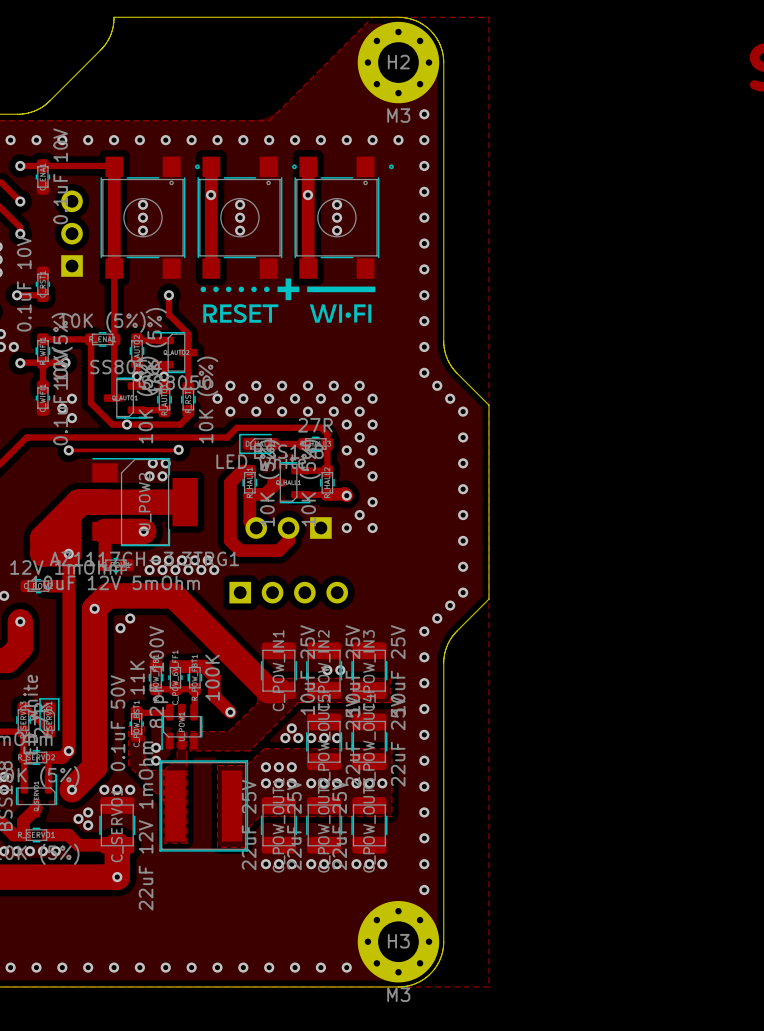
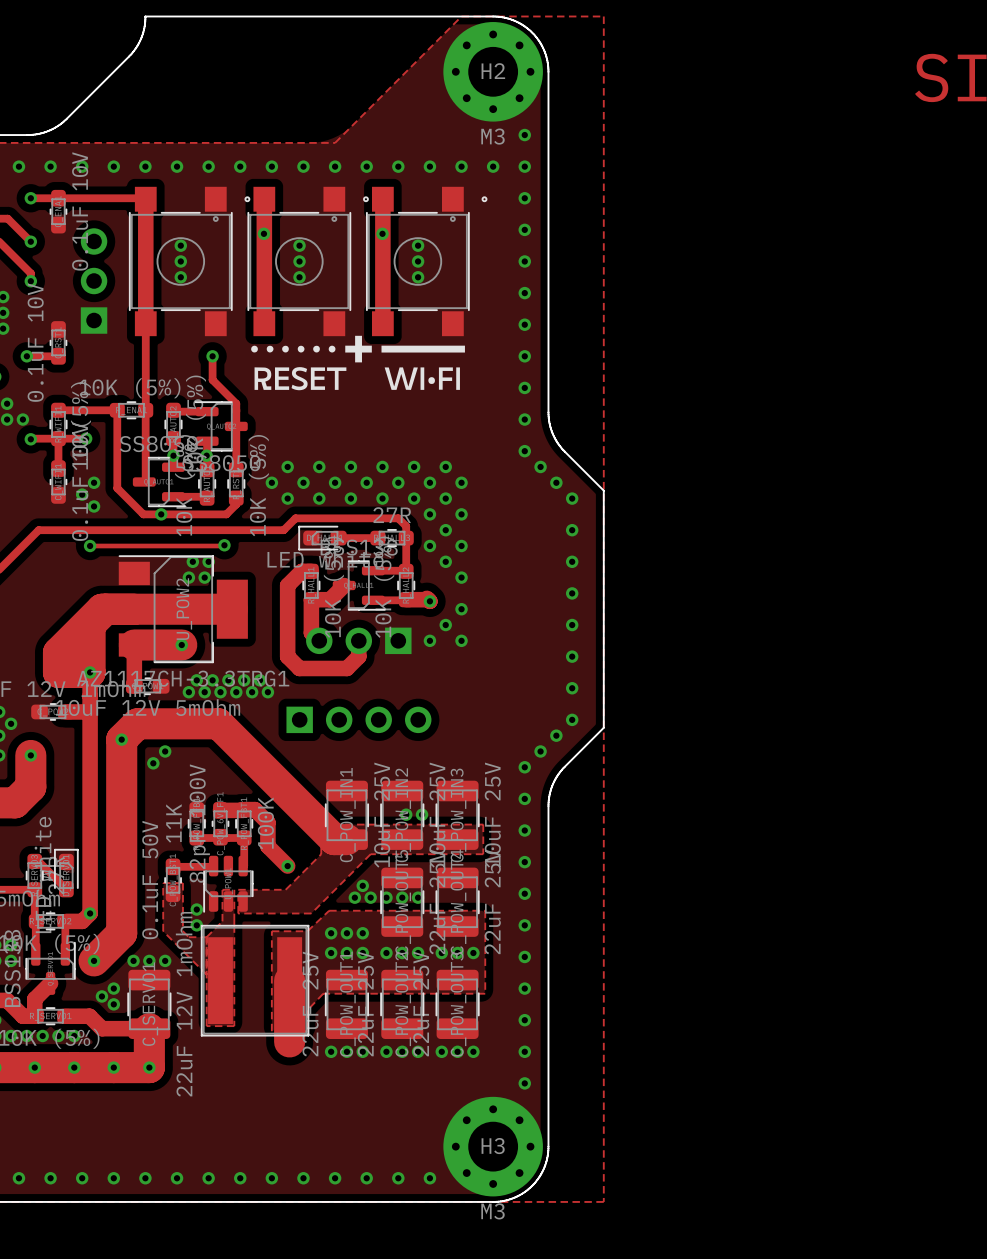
track: none -> (289, 980) (289, 1041)
via: none -> (34, 1067)
via: none -> (74, 1067)
via: none -> (113, 1067)

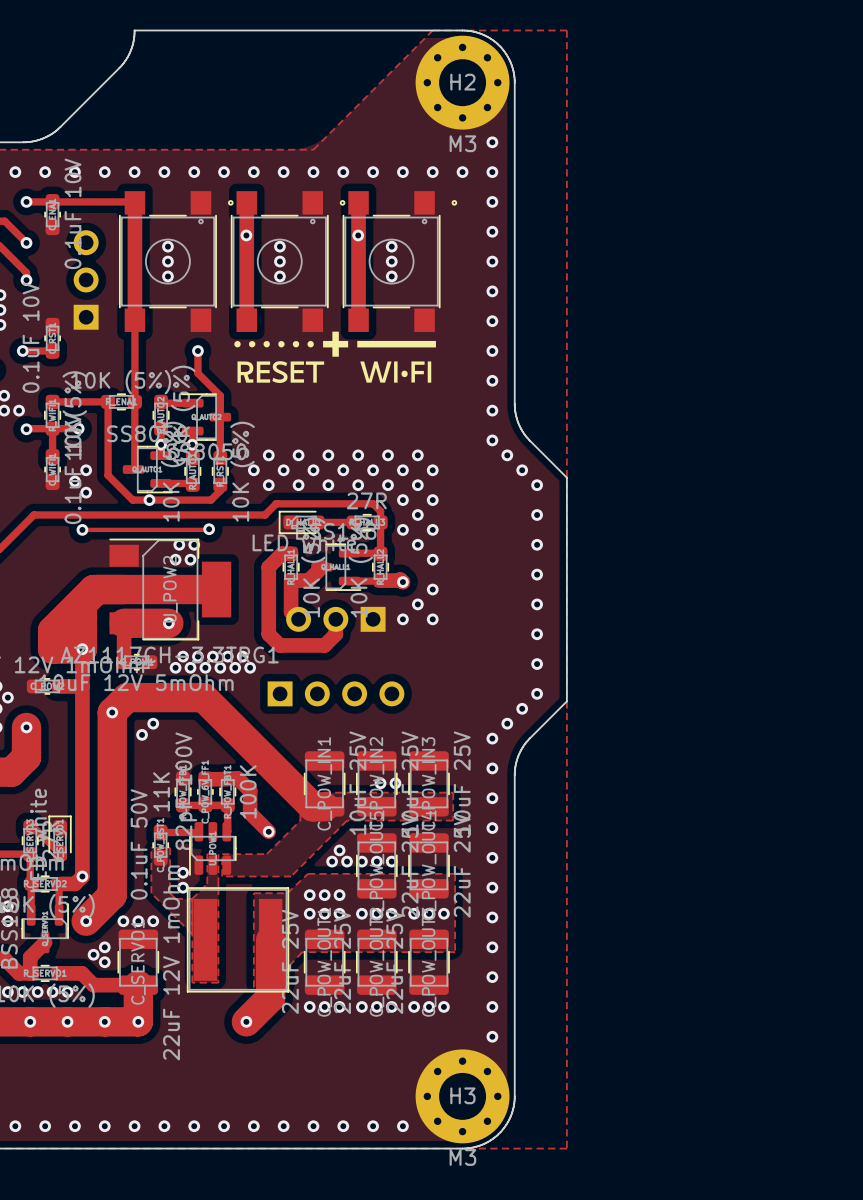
track: none -> (270, 997) (246, 1021)
via: none -> (246, 1021)

